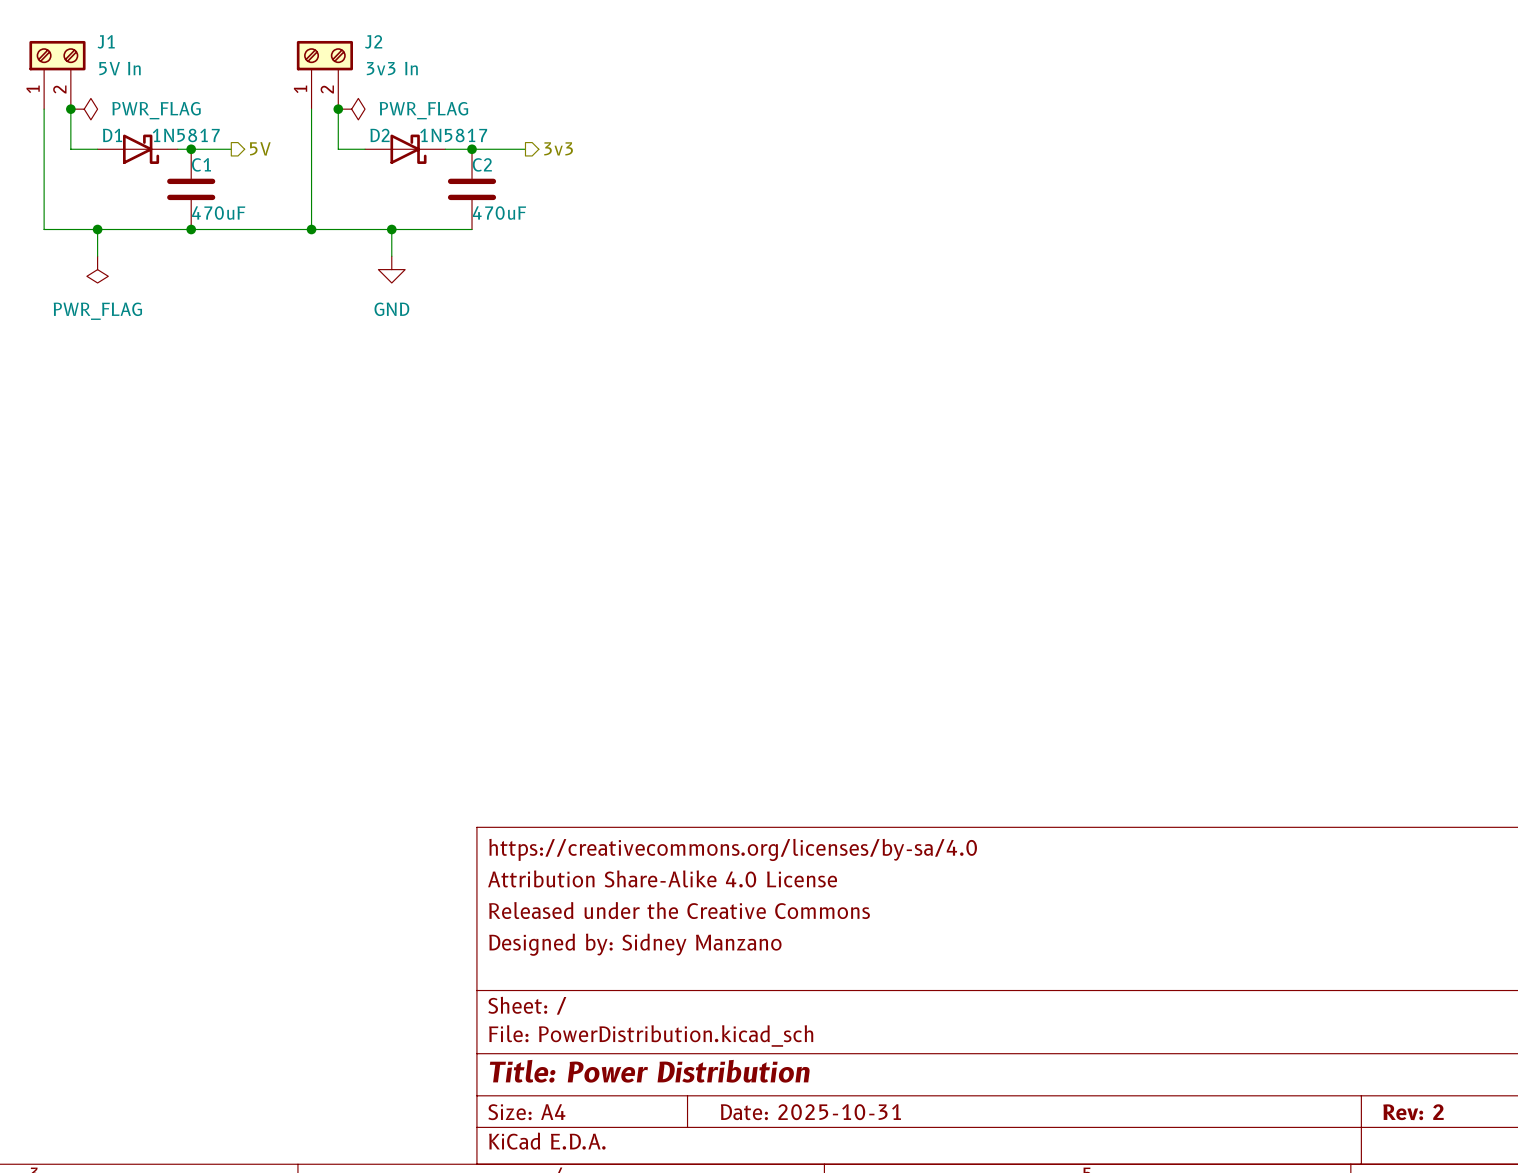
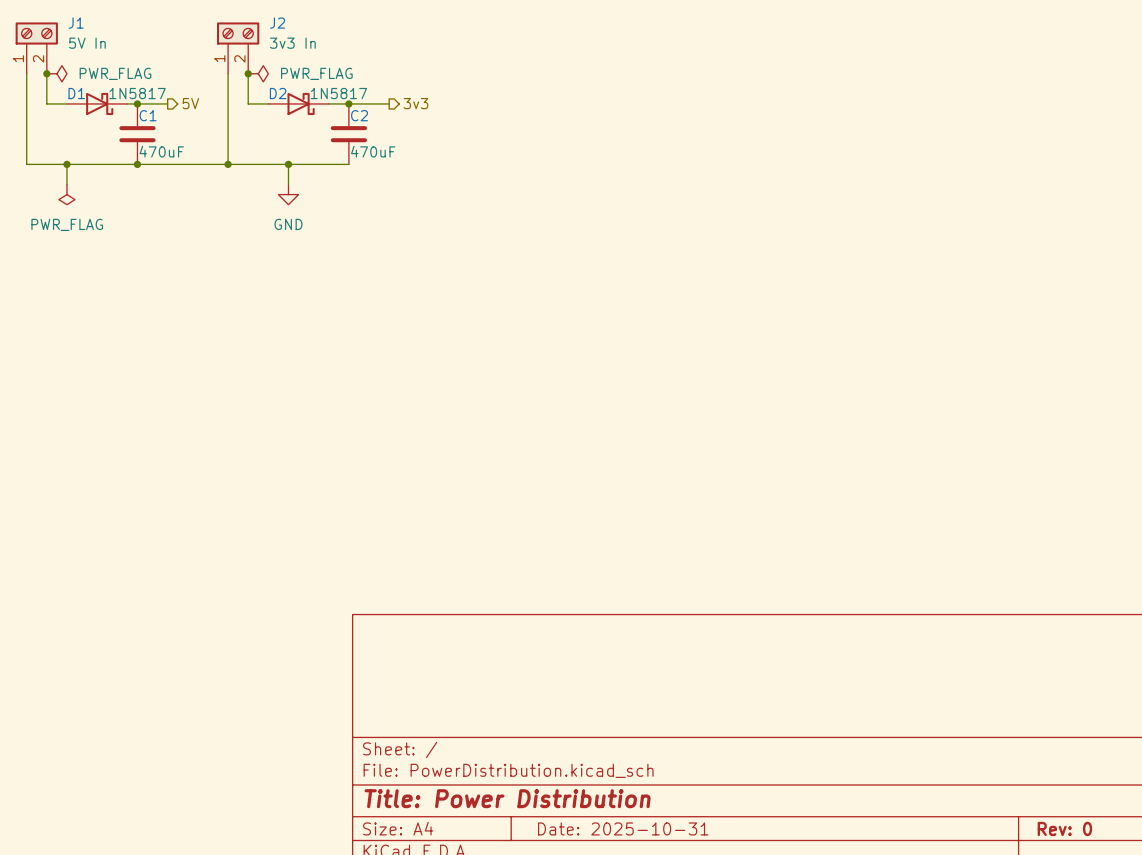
title block: https://creativecommons.org/licenses/by-sa/4.0 (733, 849) -> none
title block: Attribution Share-Alike 4.0 License (662, 878) -> none
title block: Released under the Creative Commons (679, 910) -> none
title block: Designed by: Sidney Manzano (635, 944) -> none
title block: Rev: 2 (1413, 1112) -> Rev: 0 (1064, 828)

